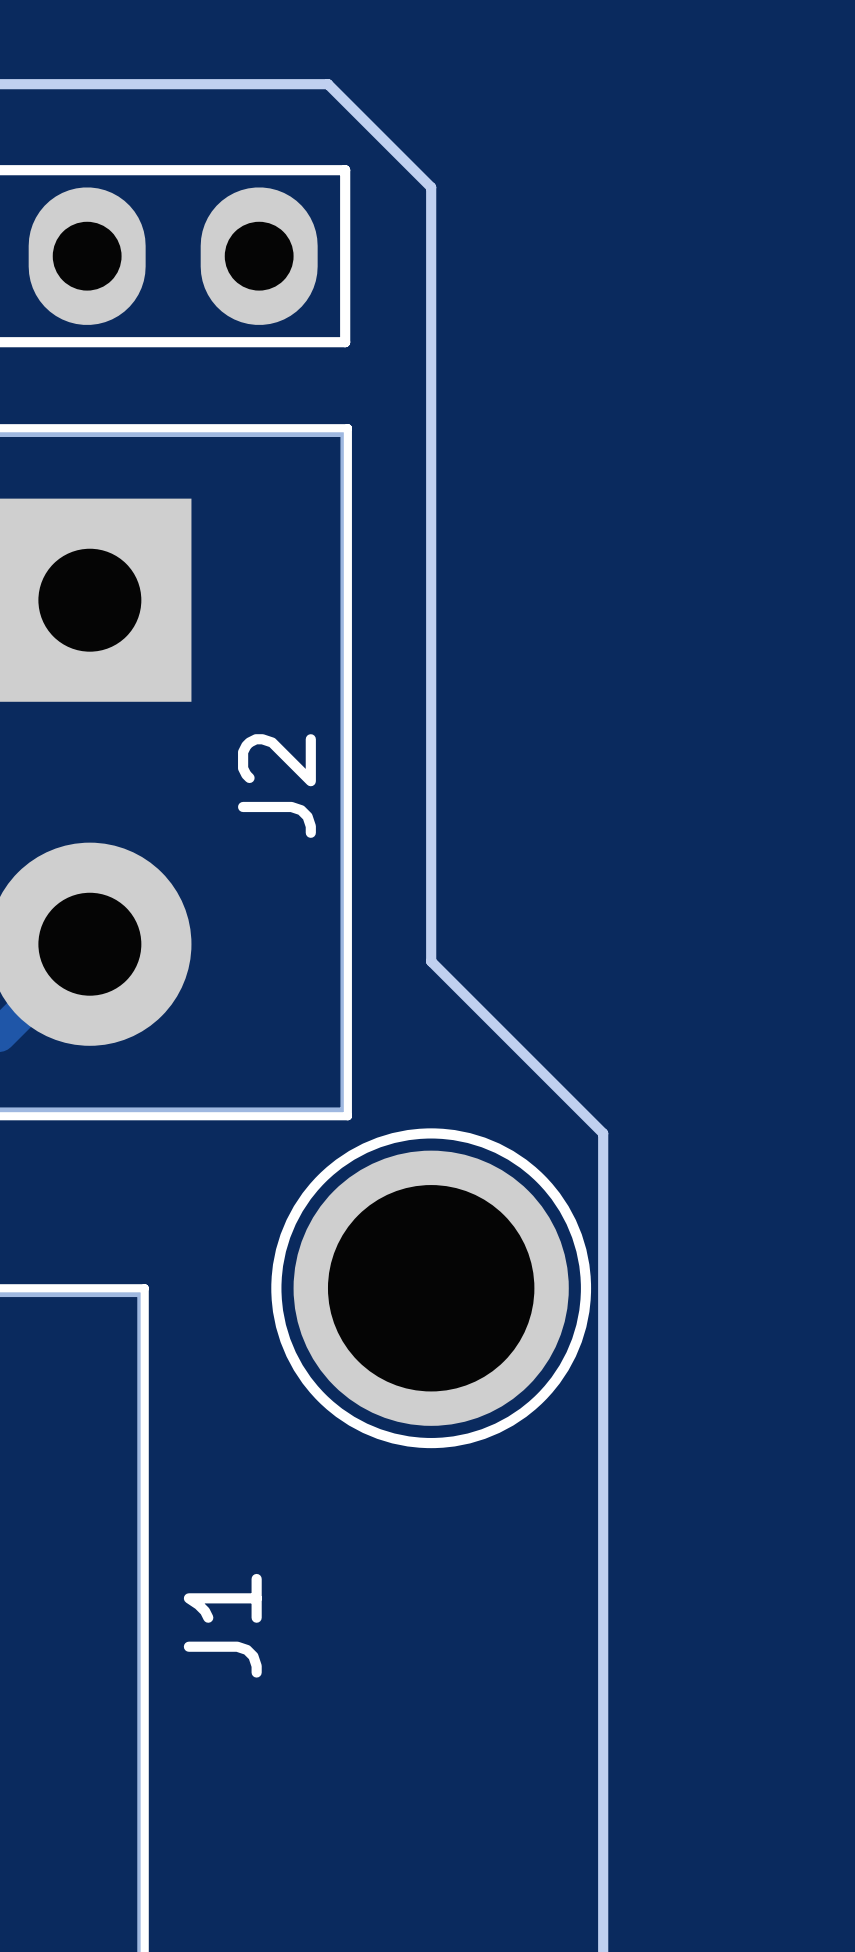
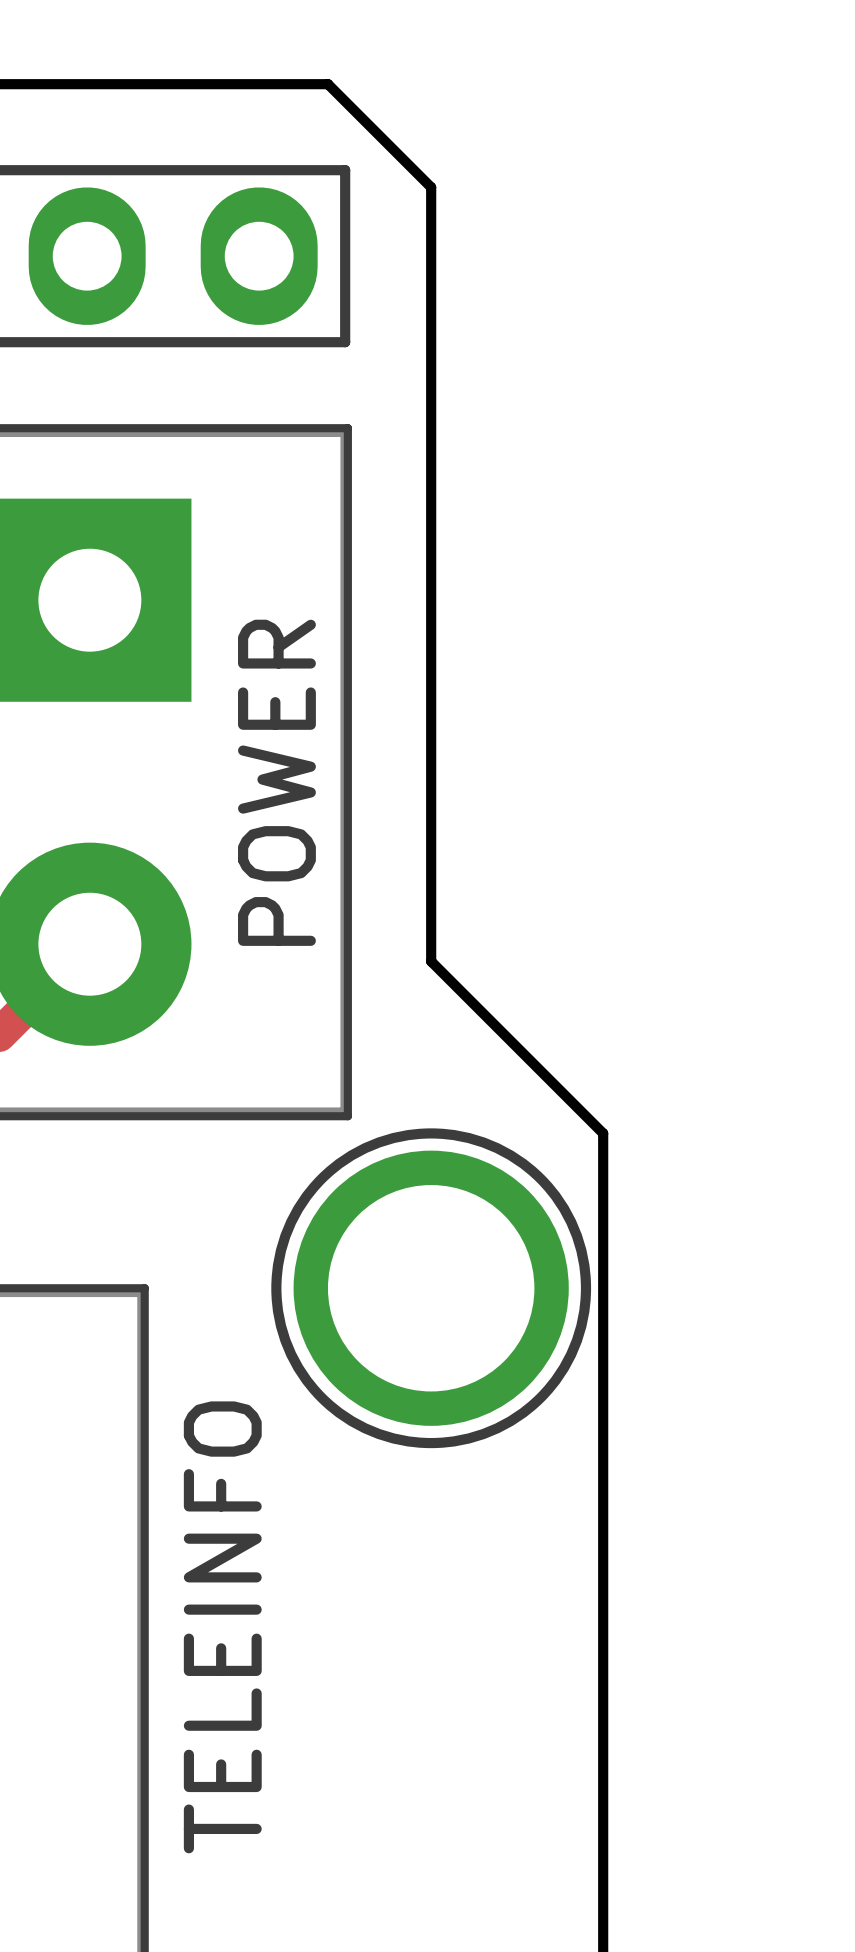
J2 name: J2 (276, 786) -> POWER (276, 782)
J1 name: J1 (222, 1625) -> TELEINFO (222, 1627)

